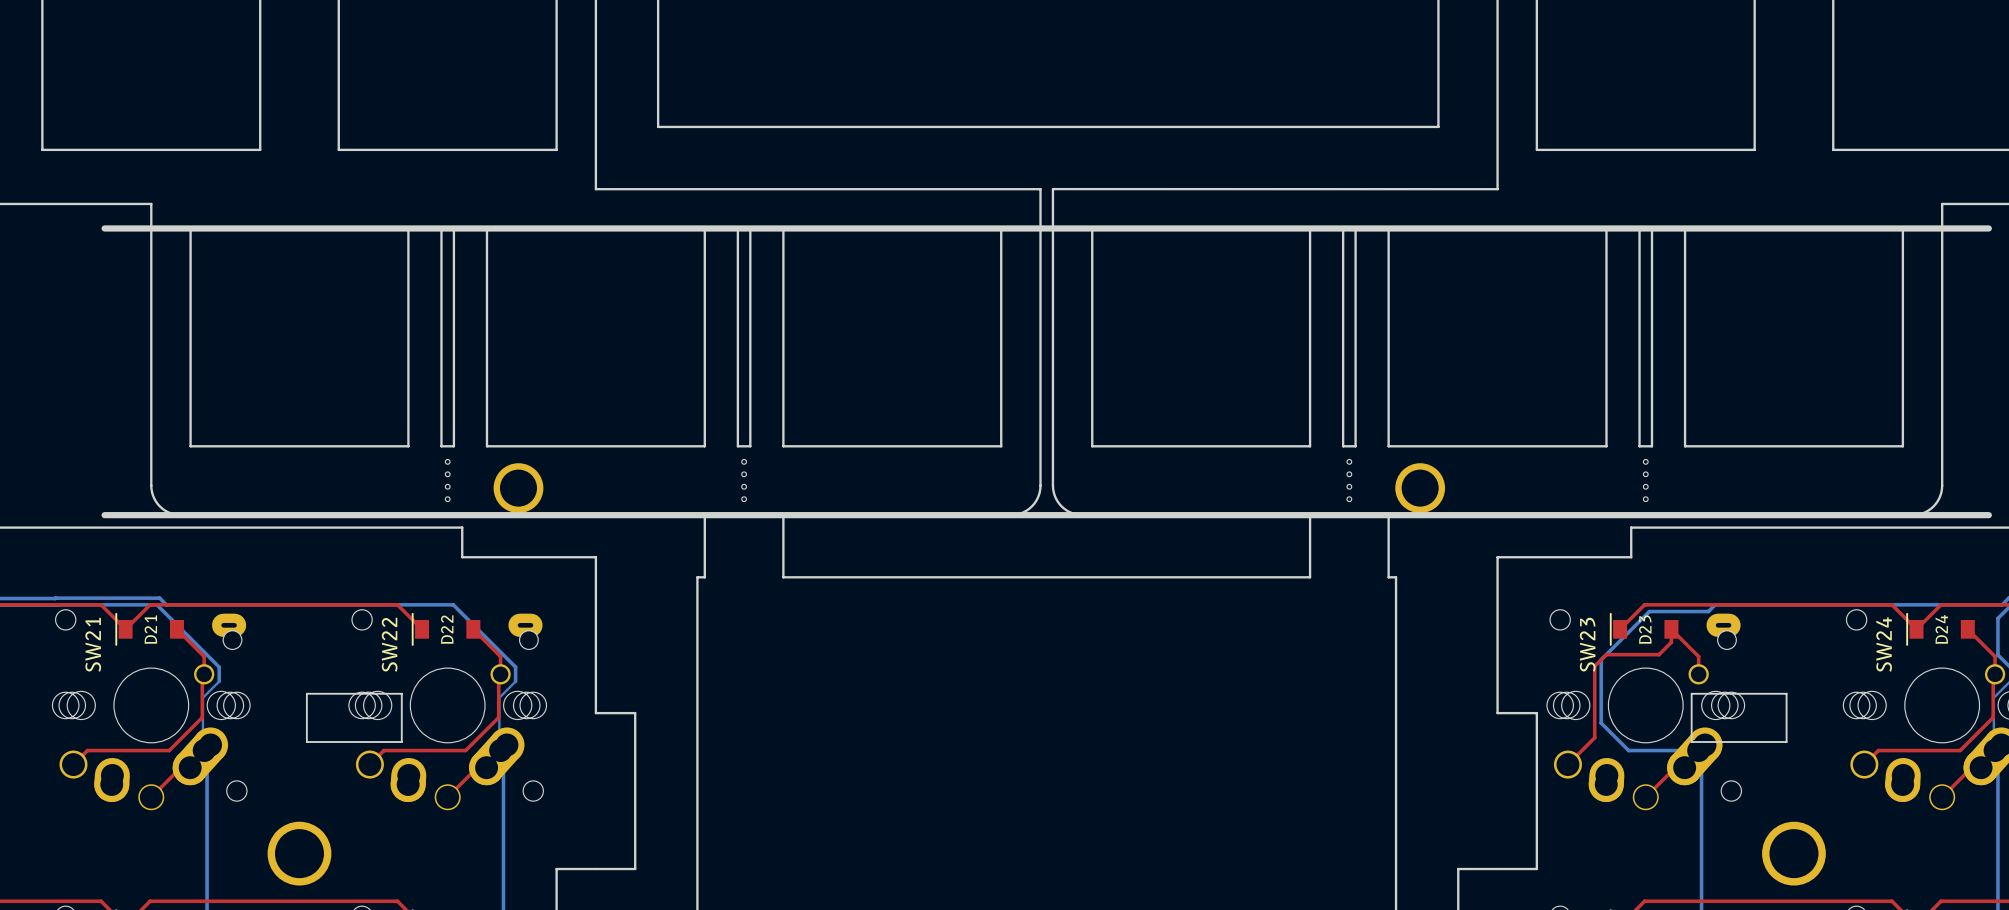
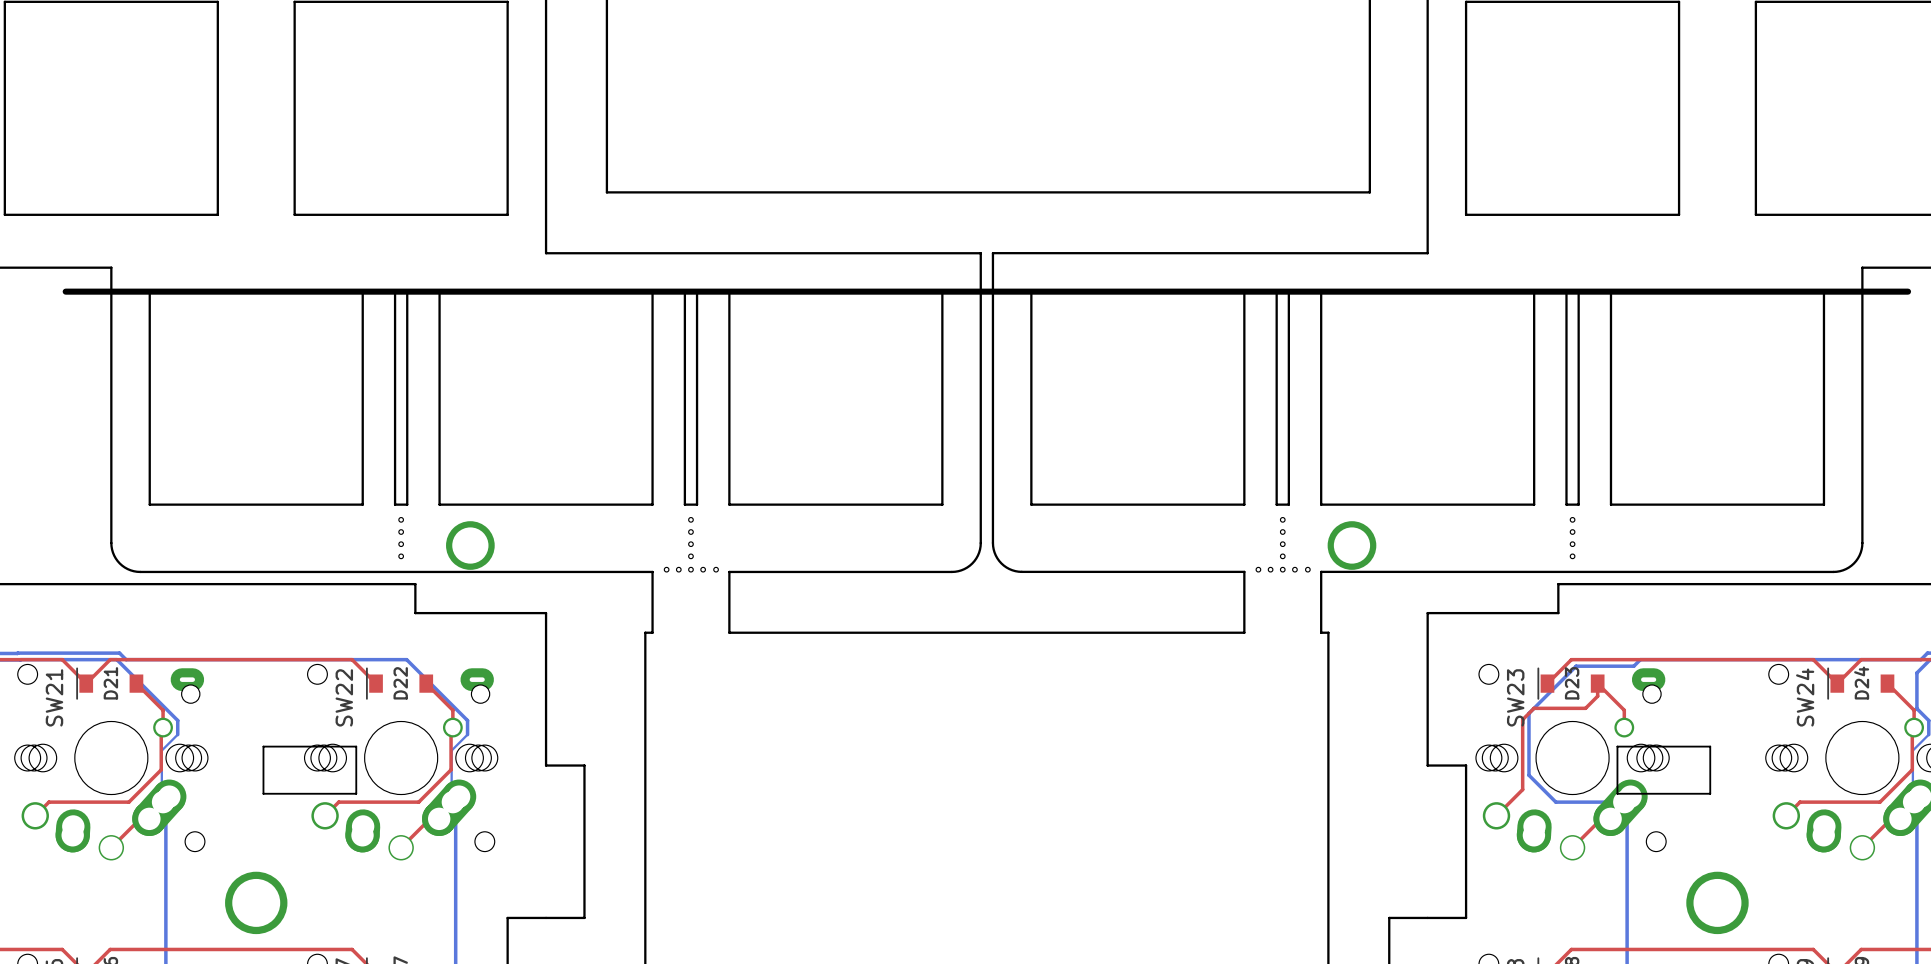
part: none -> (691, 569)
part: none -> (1283, 569)
board edge: (104, 515) (1988, 515) -> none

